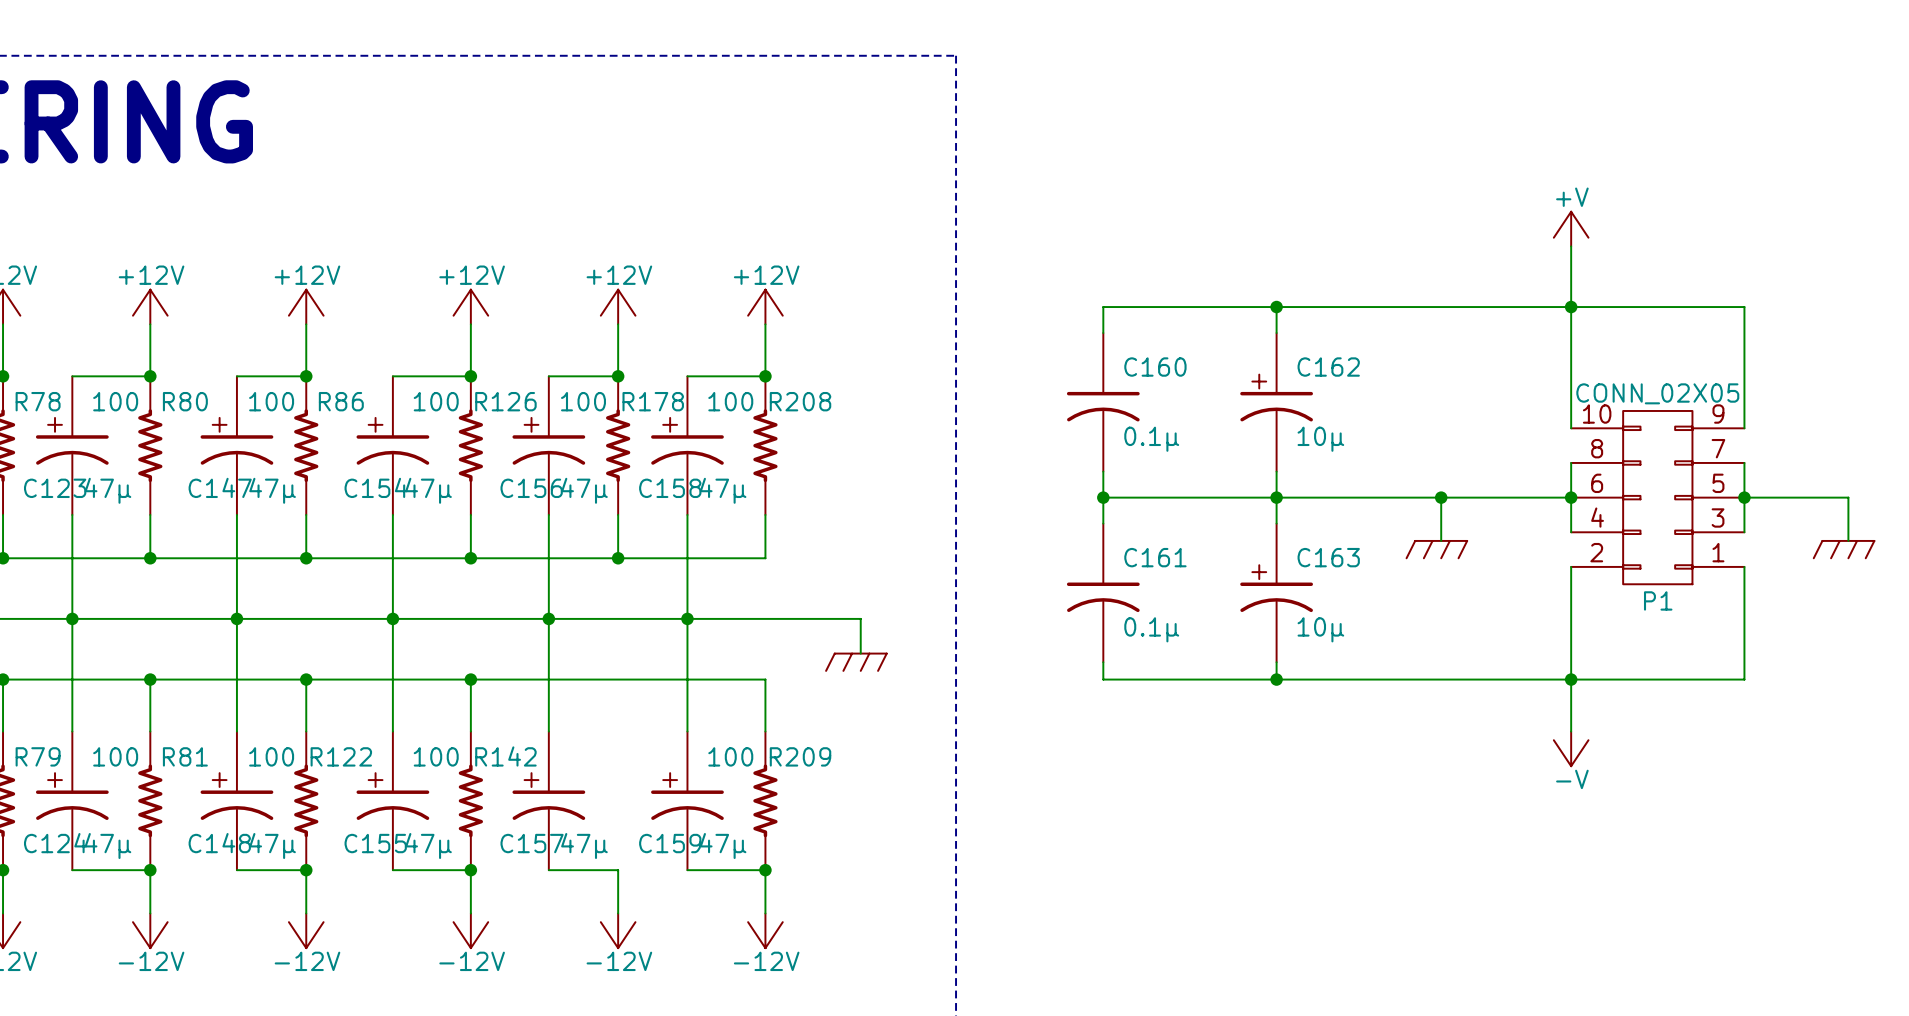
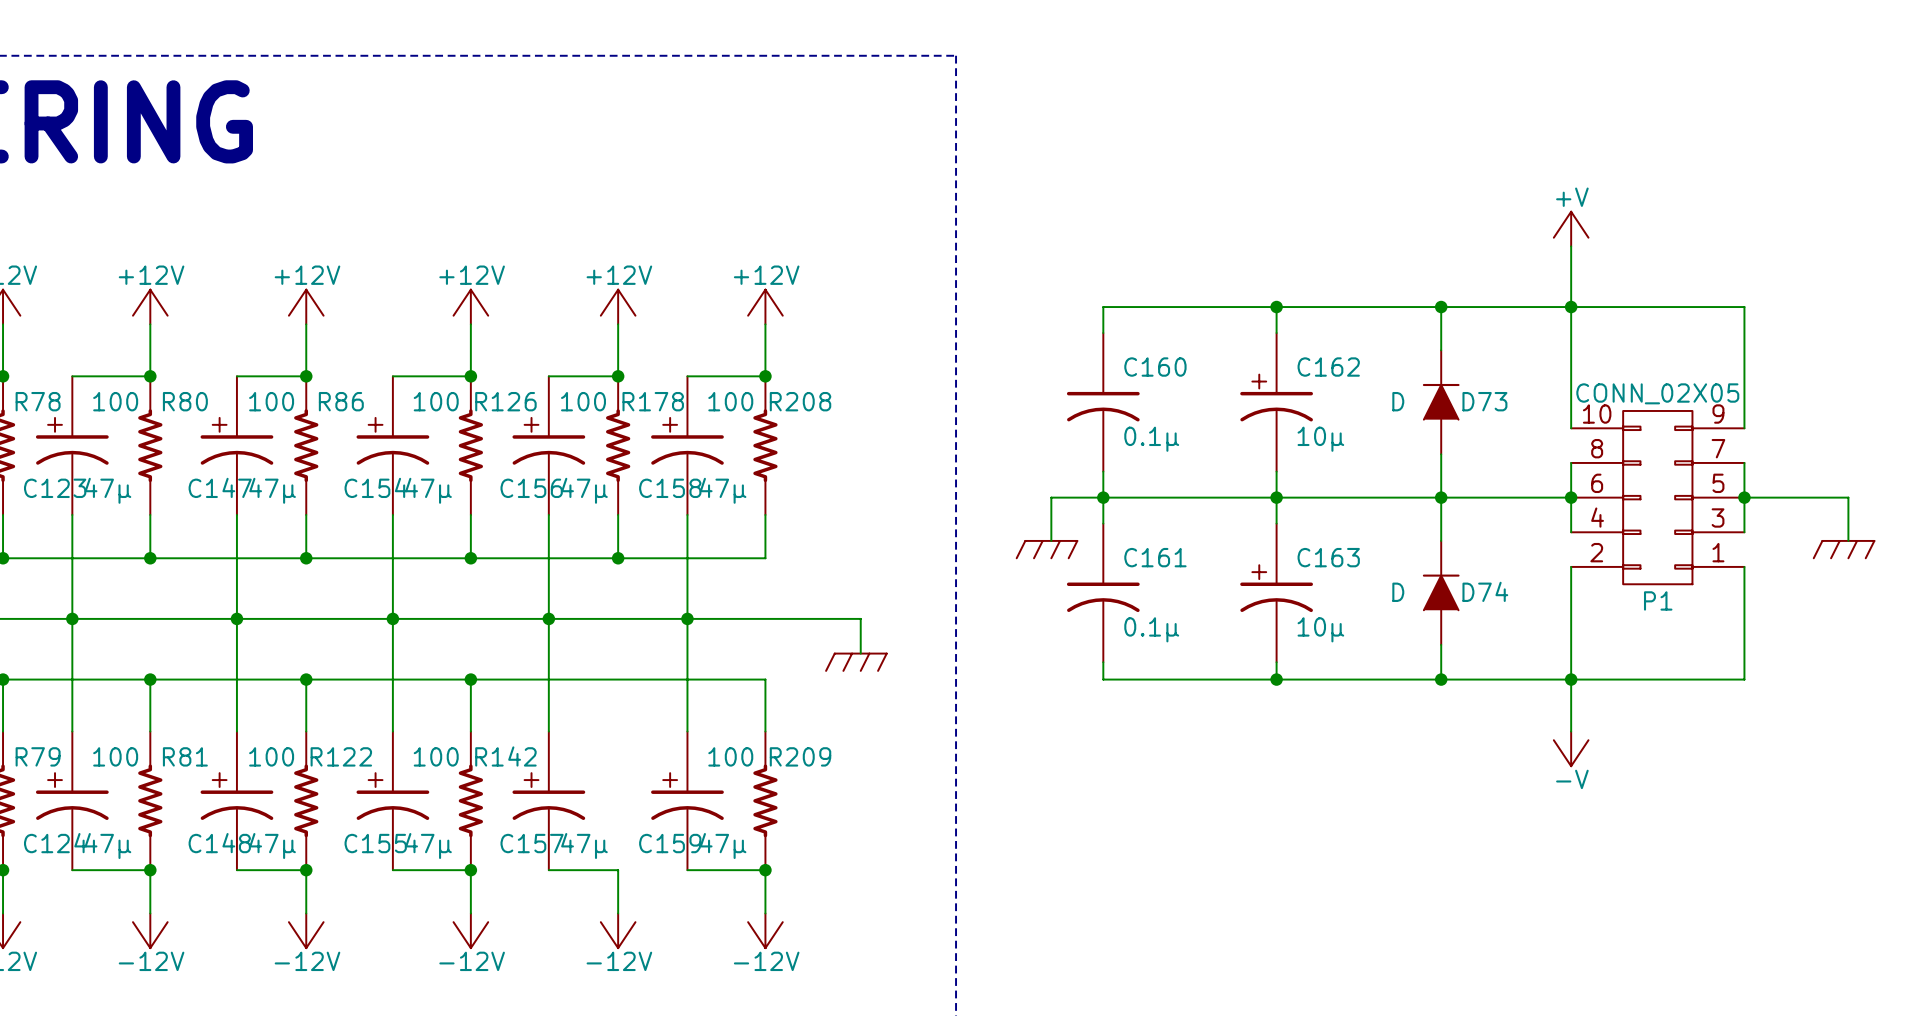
wire: none -> (1441, 307) (1441, 350)
junction: none -> (1441, 307)
D73: none -> D (1441, 402)
wire: none -> (1441, 454) (1441, 497)
wire: none -> (1103, 497) (1051, 497) (1051, 540)
power symbol: none -> (1047, 549)
power symbol: (1436, 549) -> none
D74: none -> D (1441, 592)
wire: none -> (1441, 644) (1441, 679)
junction: none -> (1441, 679)

